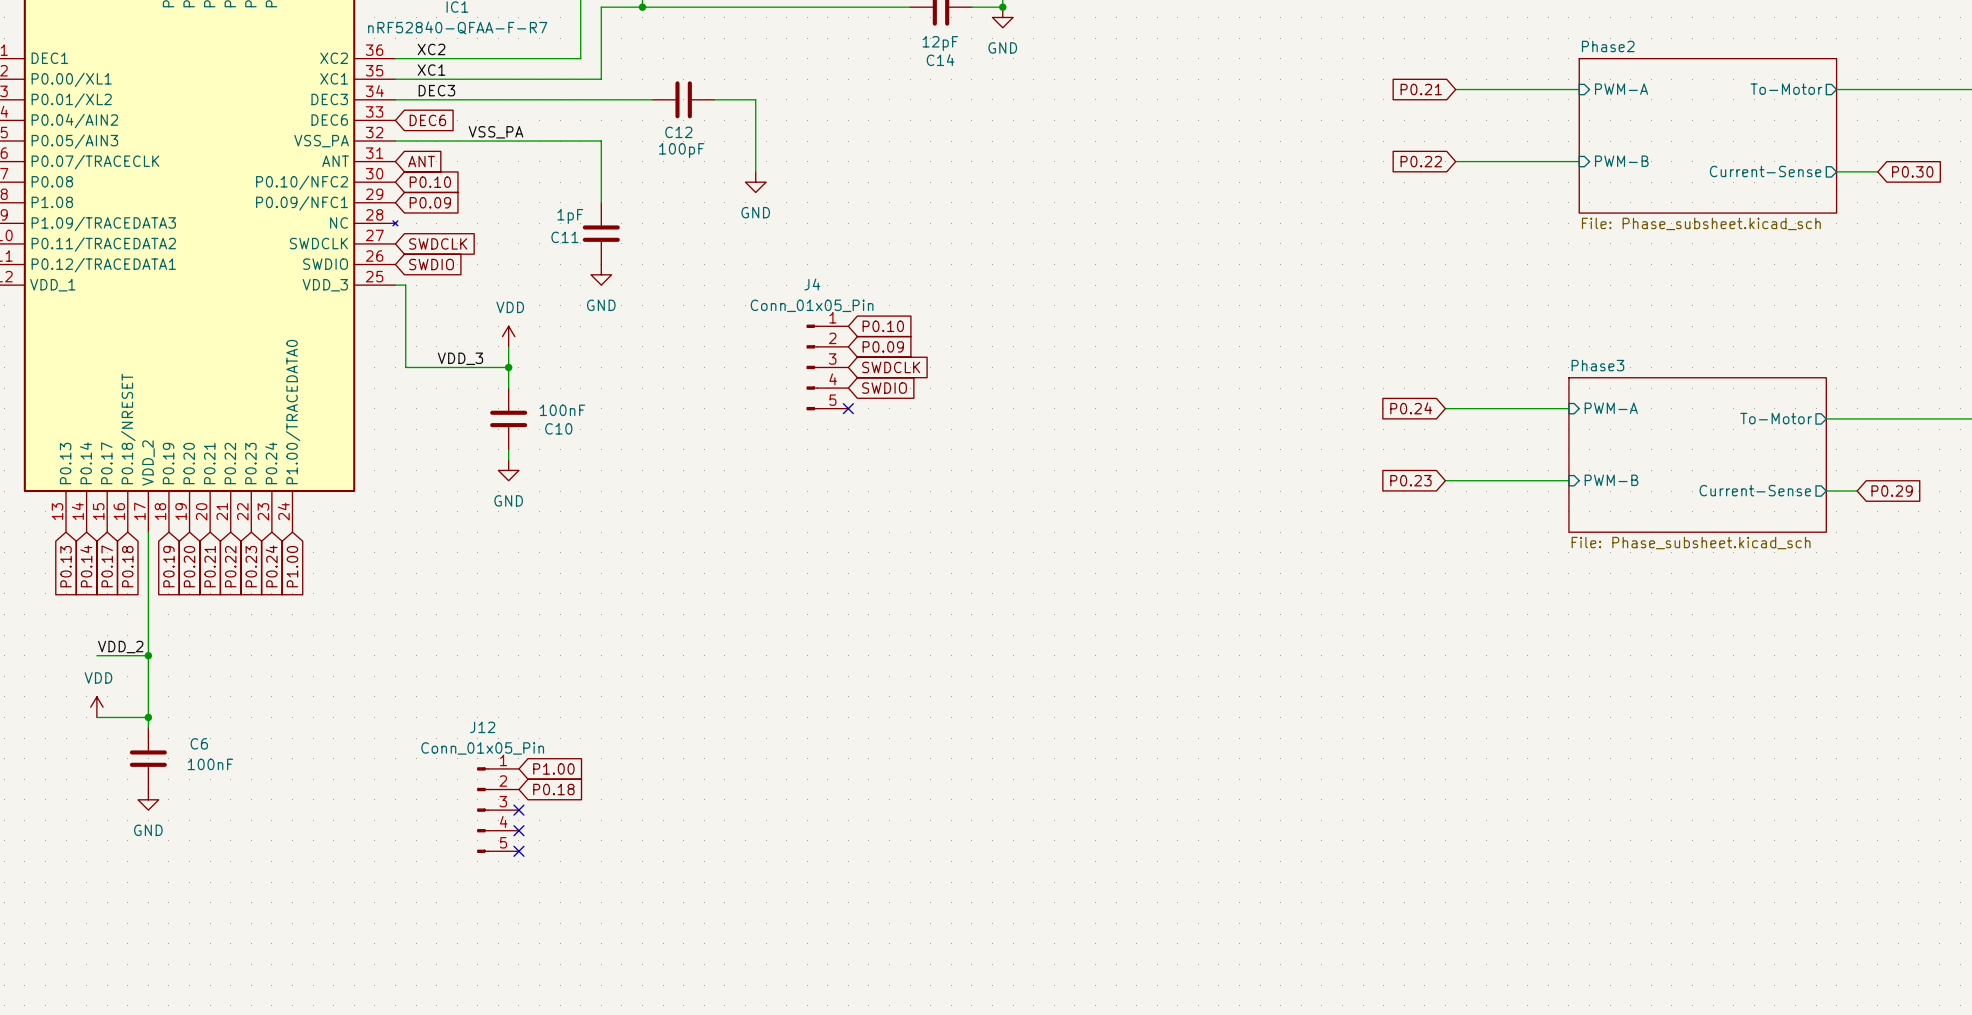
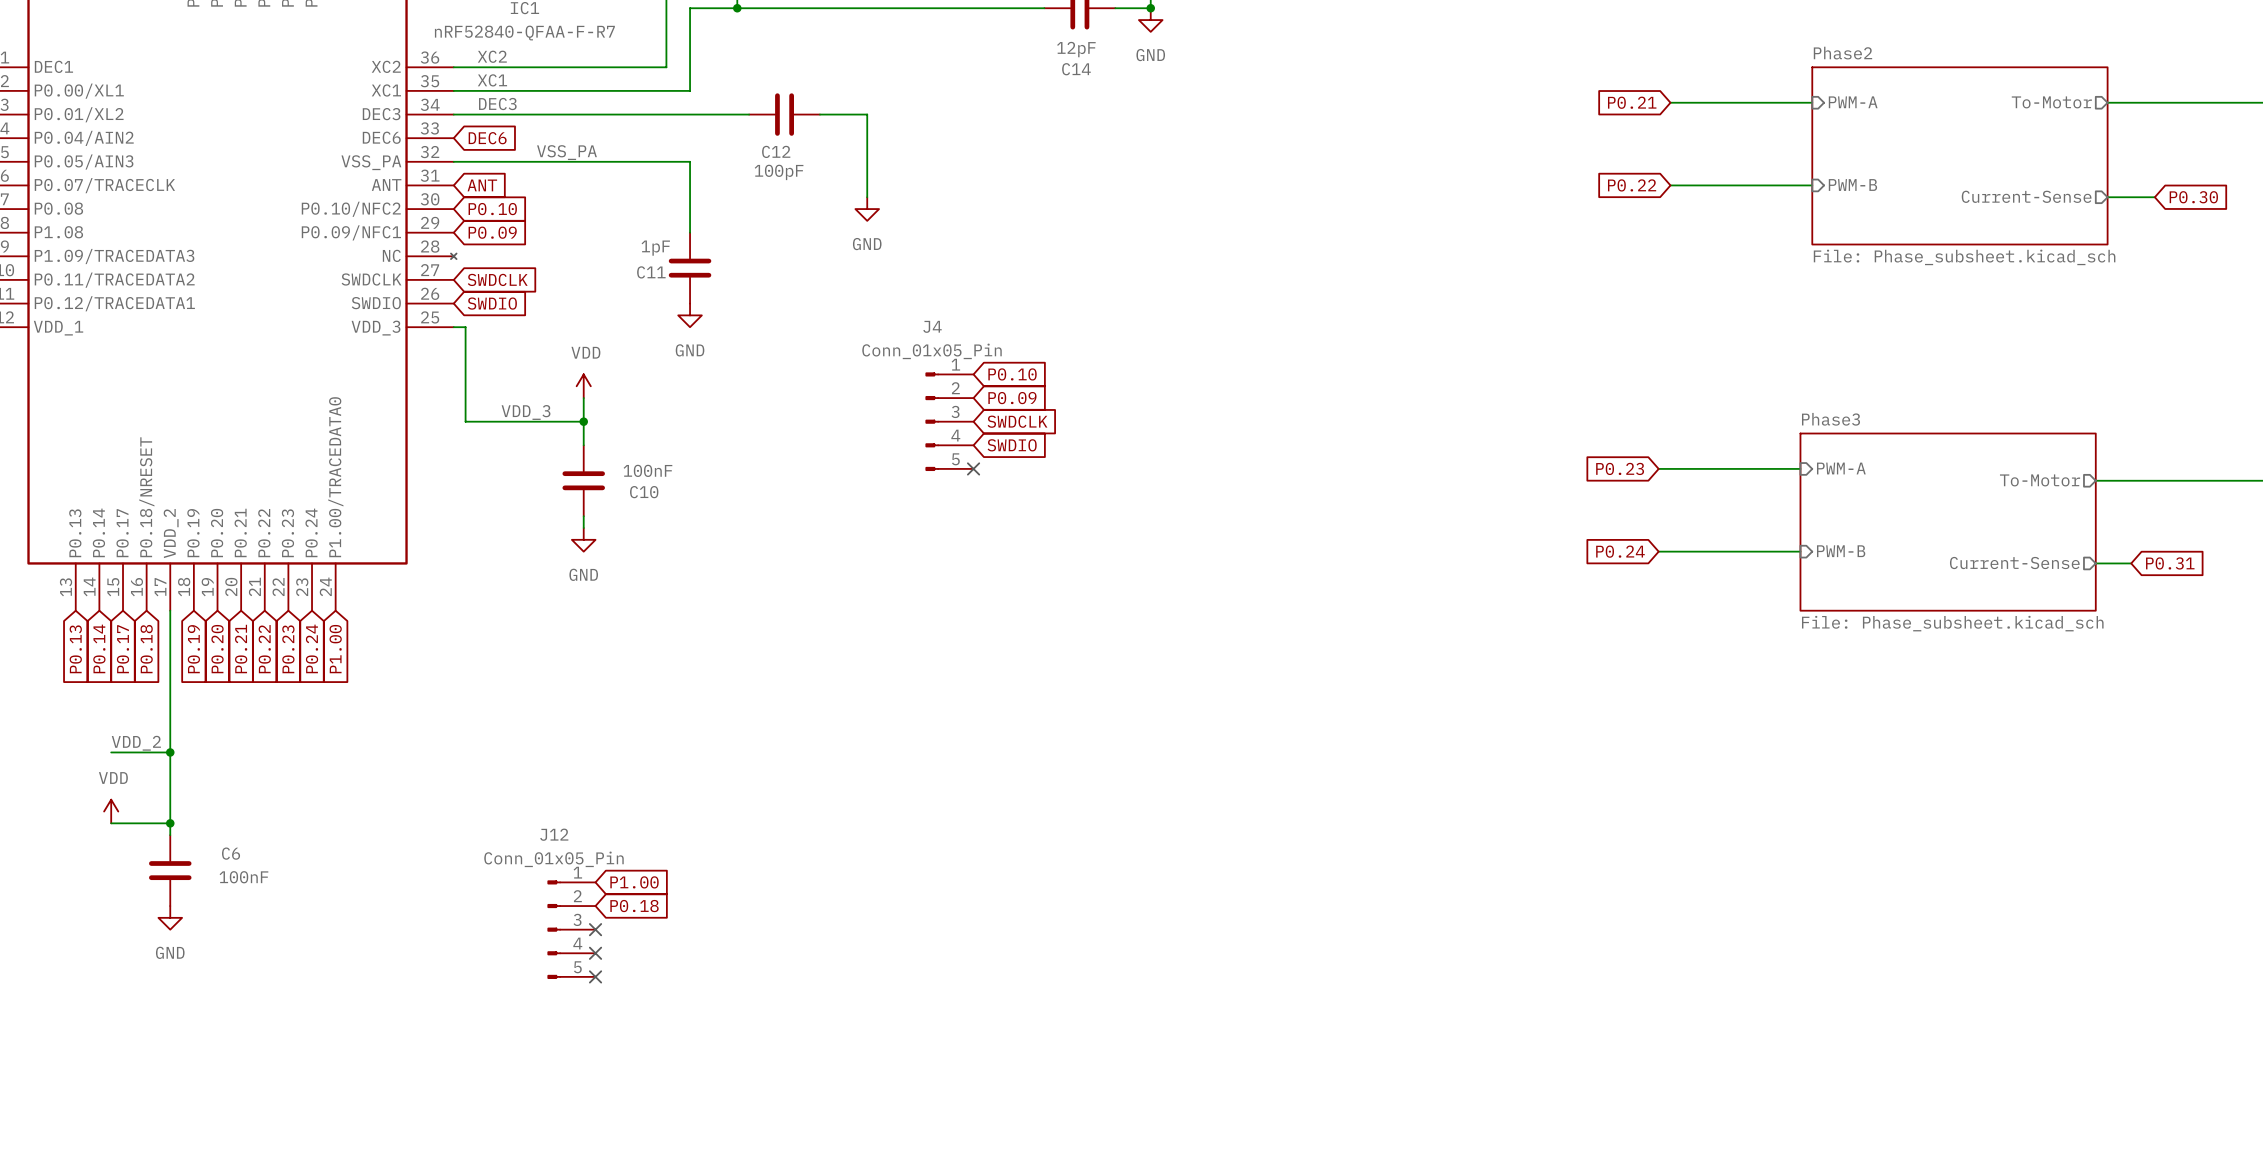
global label: P0.24 (1411, 408) -> P0.23 (1620, 468)
global label: P0.23 (1410, 480) -> P0.24 (1620, 551)
global label: P0.29 (1892, 491) -> P0.31 (2170, 563)

